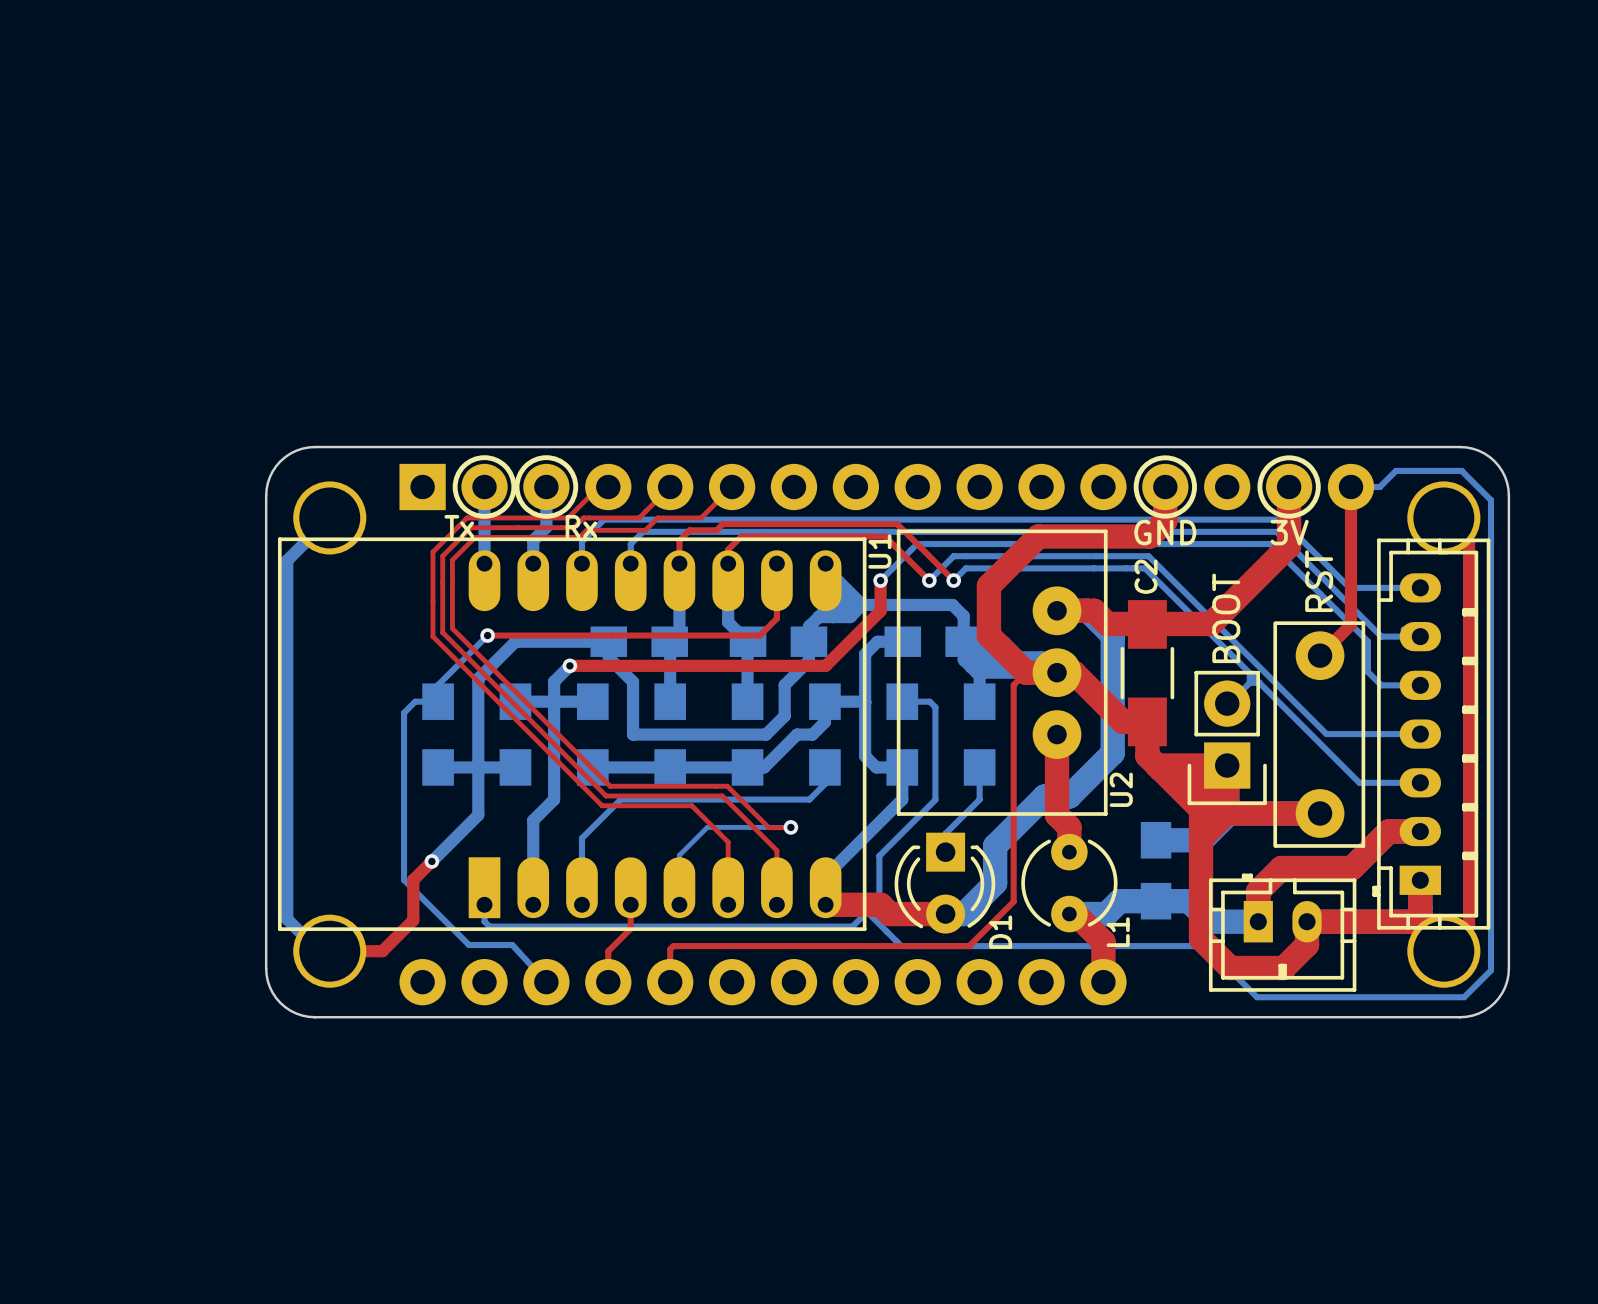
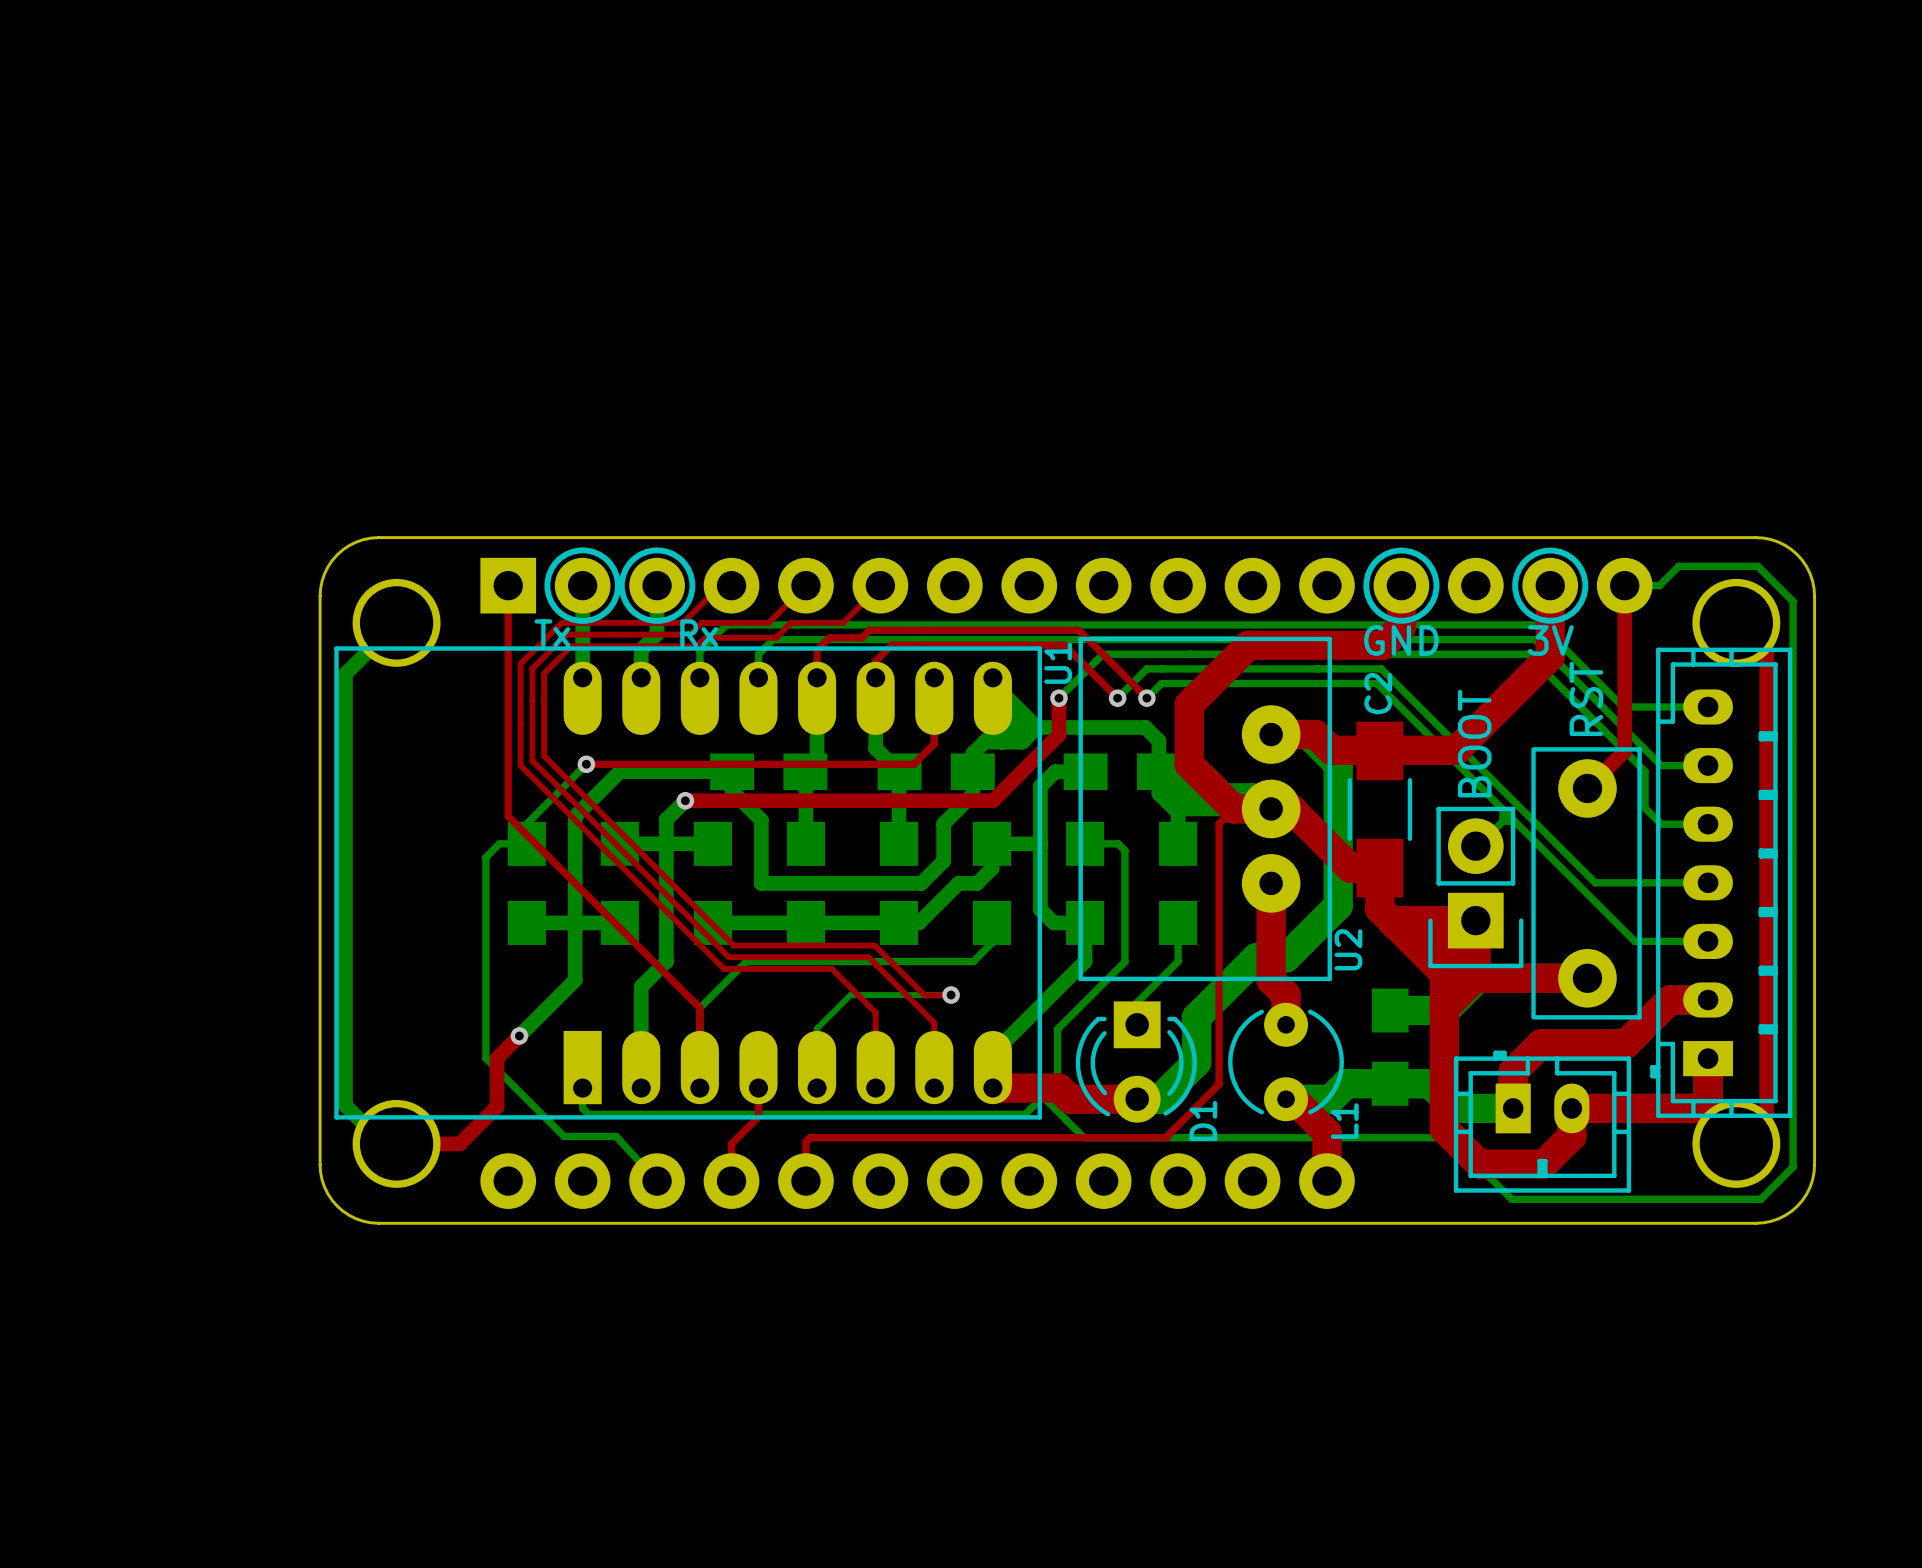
top track: none -> (508, 585) (508, 816) (699, 1008) (699, 1088)

